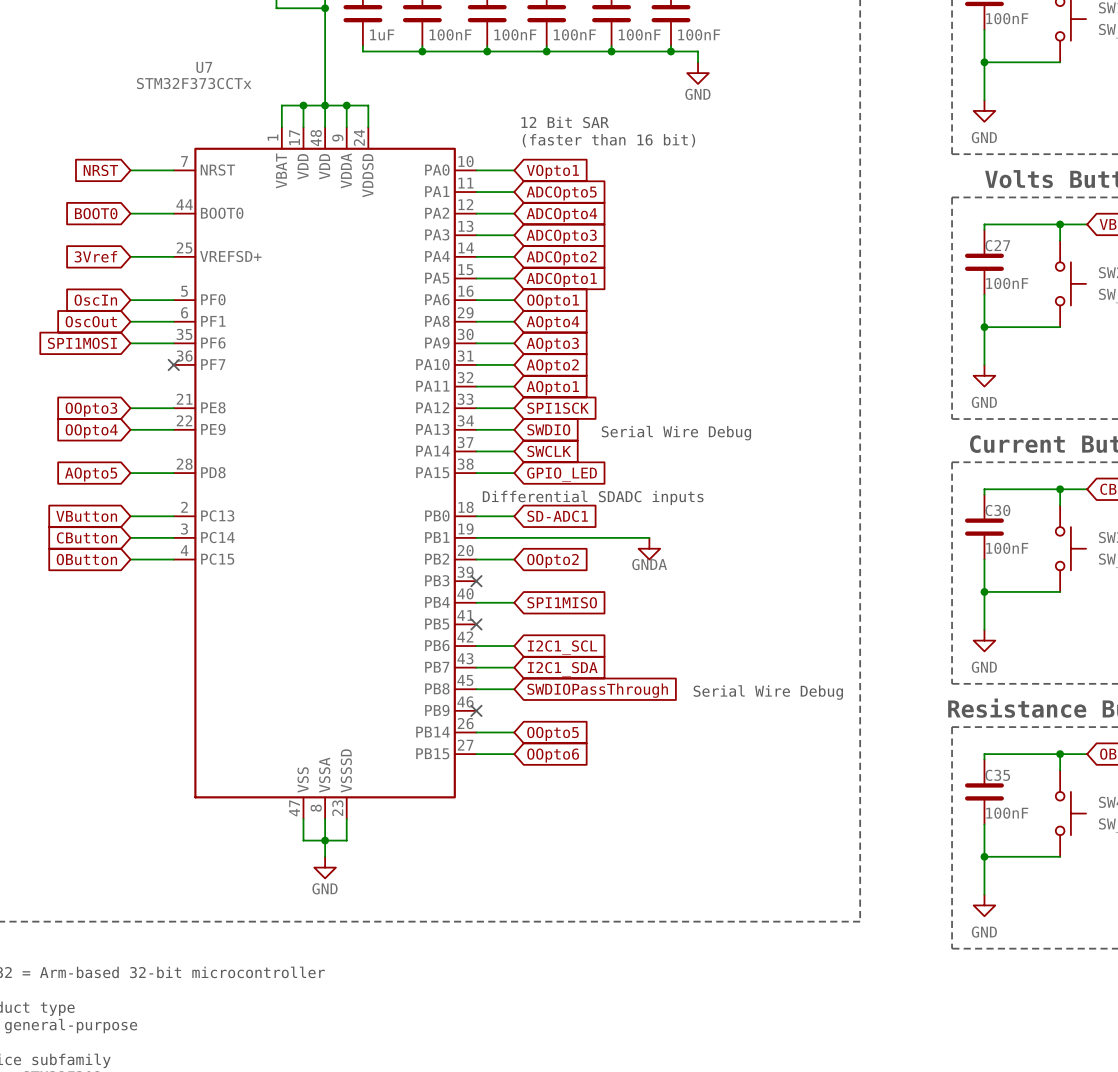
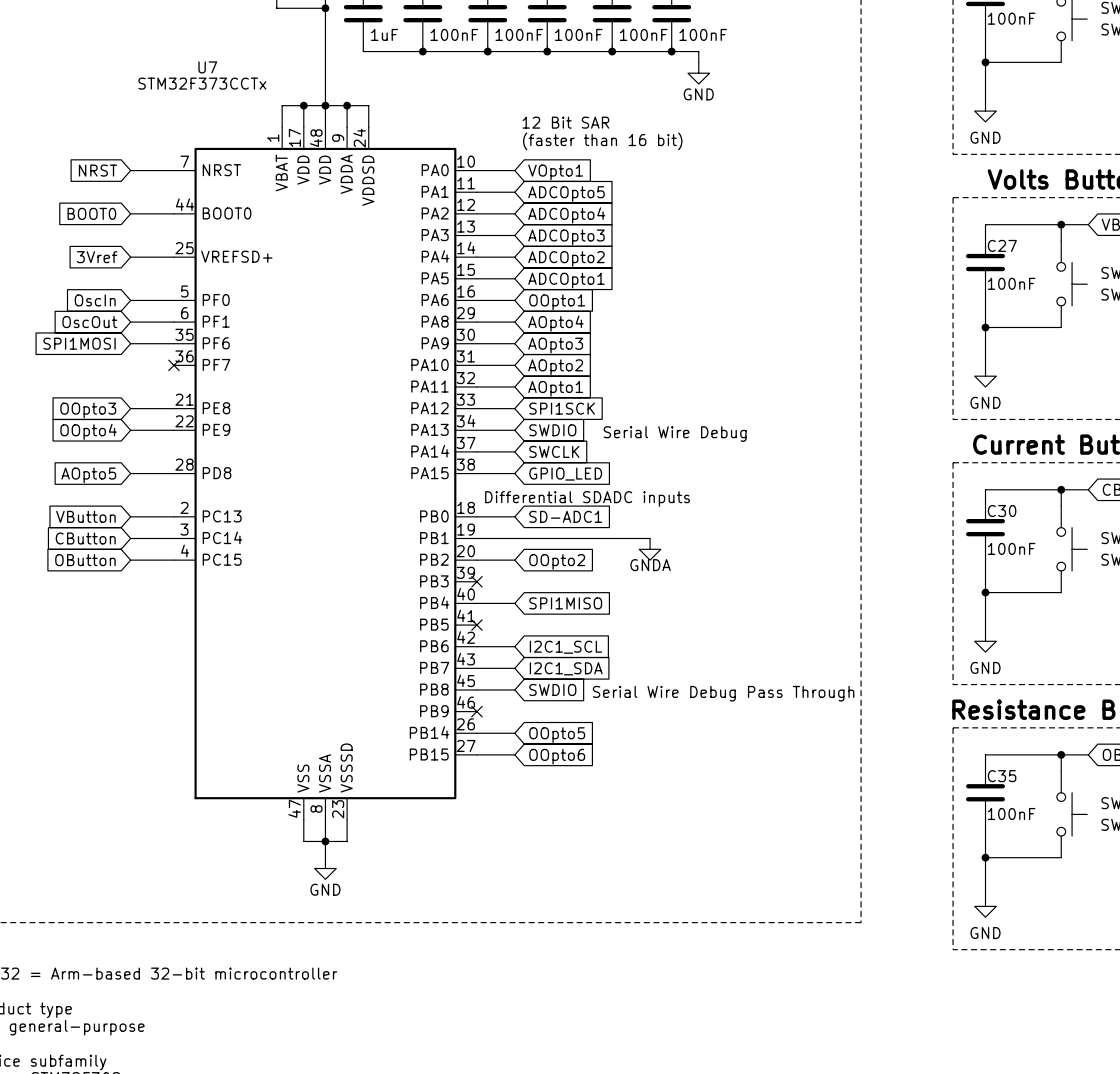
global label: SWDIOPassThrough (597, 690) -> SWDIO (552, 689)
text: Serial Wire Debug (768, 692) -> Serial Wire Debug Pass Through (723, 693)

